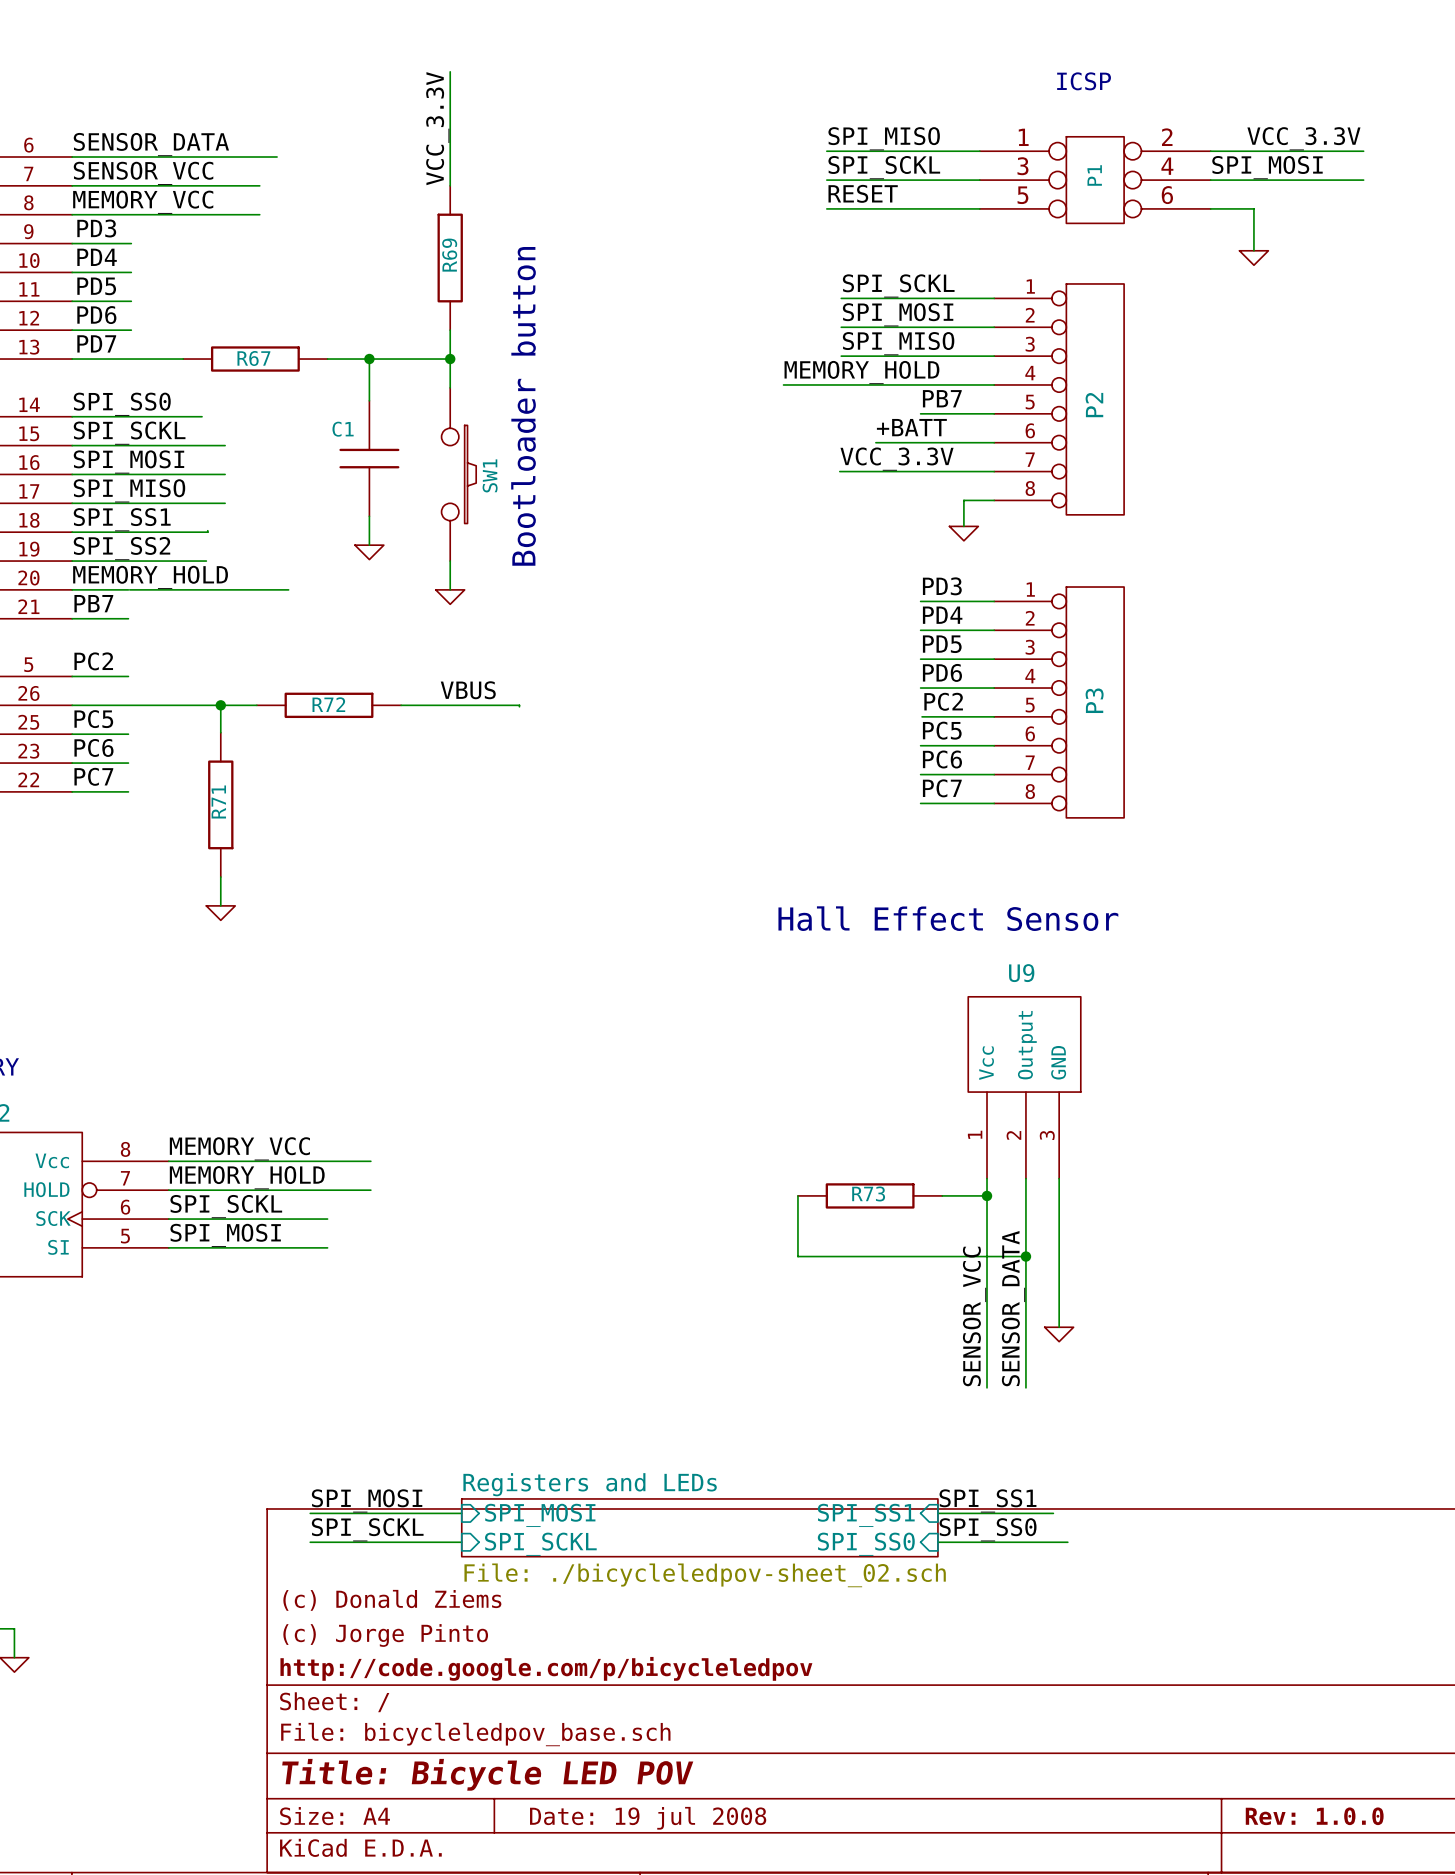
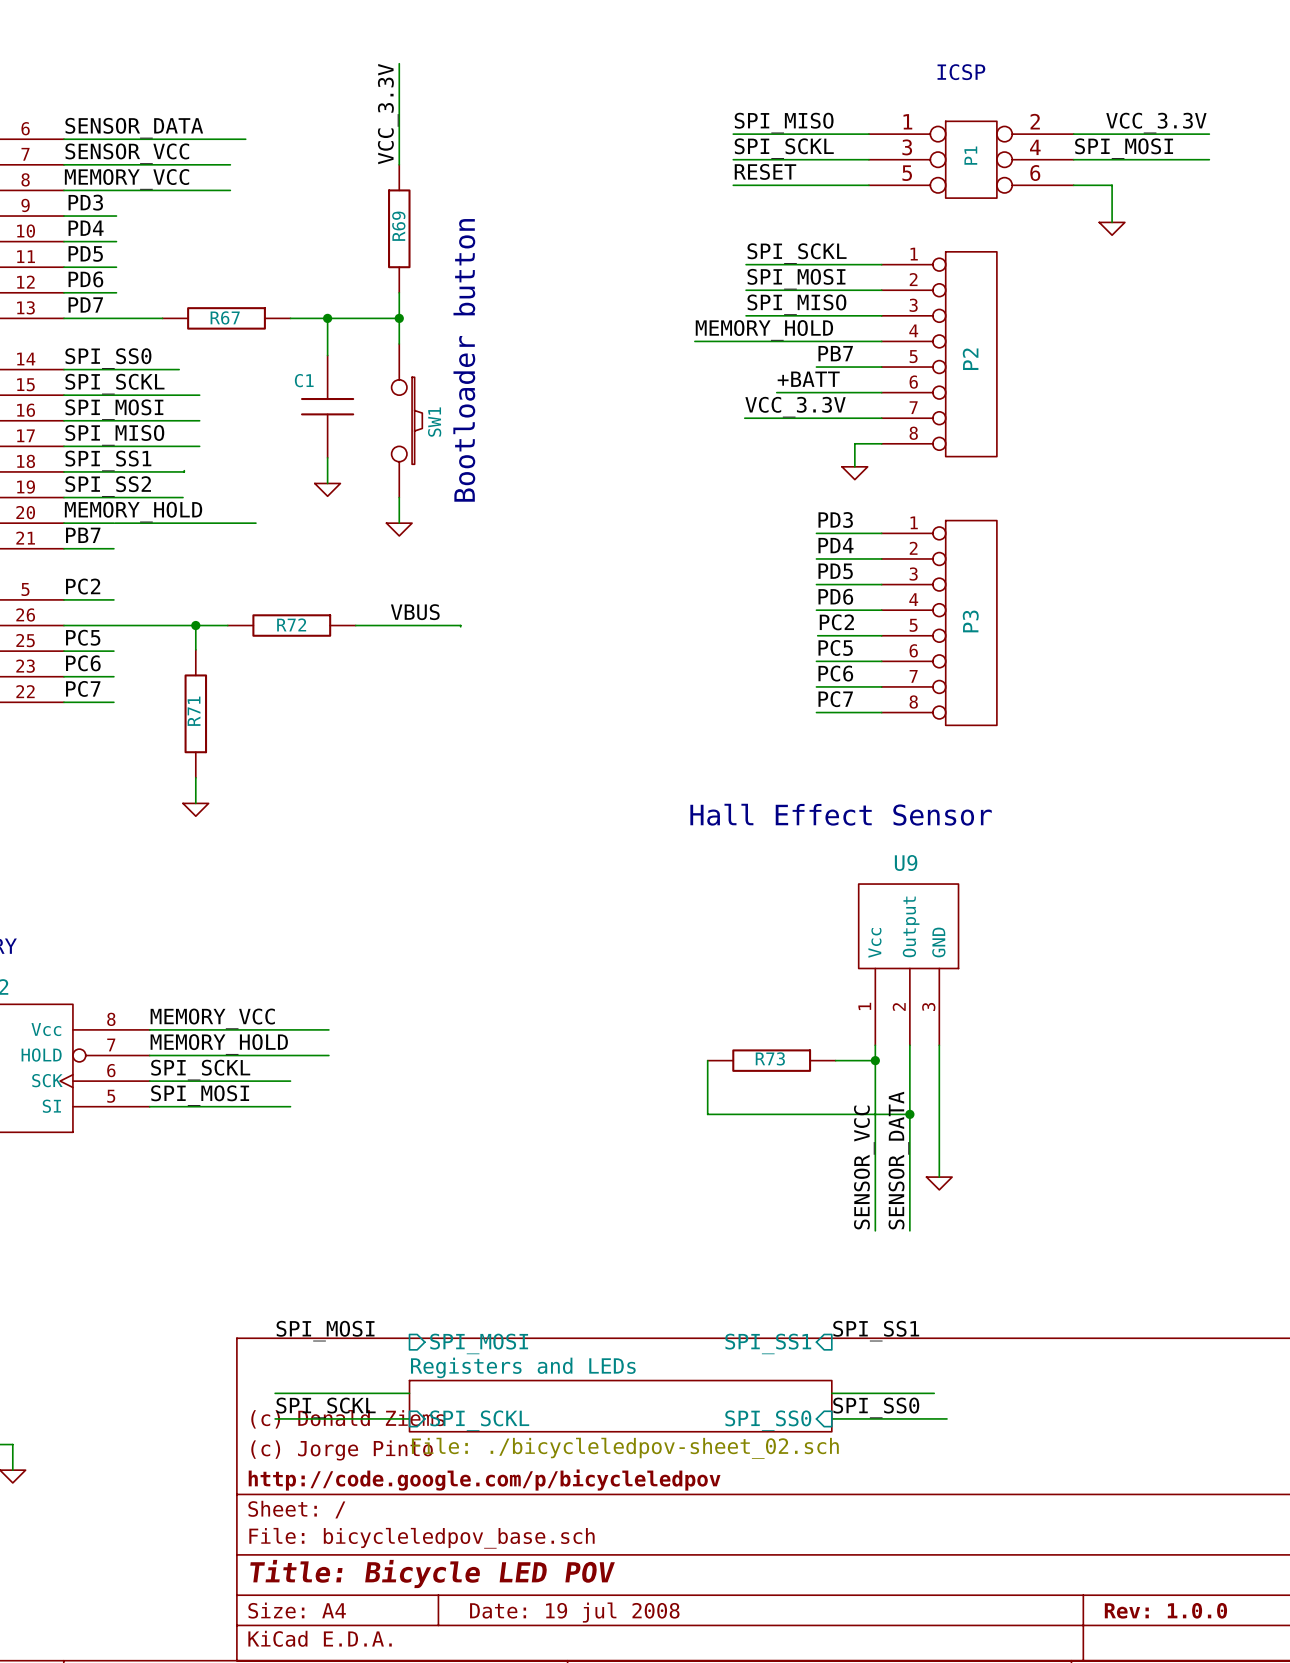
wire: (310, 1513) (461, 1513) -> (275, 1393) (409, 1393)
wire: (937, 1513) (1053, 1513) -> (831, 1393) (934, 1393)
sheet Registers and LEDs position: (699, 1527) -> (620, 1406)
label position: SPI_SCKL (367, 1529) -> SPI_SCKL (326, 1407)
label position: SPI_SS0 (988, 1529) -> SPI_SS0 (876, 1407)
wire: (310, 1542) (461, 1542) -> (275, 1418) (409, 1418)
wire: (937, 1542) (1067, 1542) -> (831, 1418) (946, 1418)
sheet pin position: SPI_SCKL (540, 1544) -> SPI_SCKL (479, 1420)
sheet pin position: SPI_SS0 (866, 1544) -> SPI_SS0 (768, 1420)

